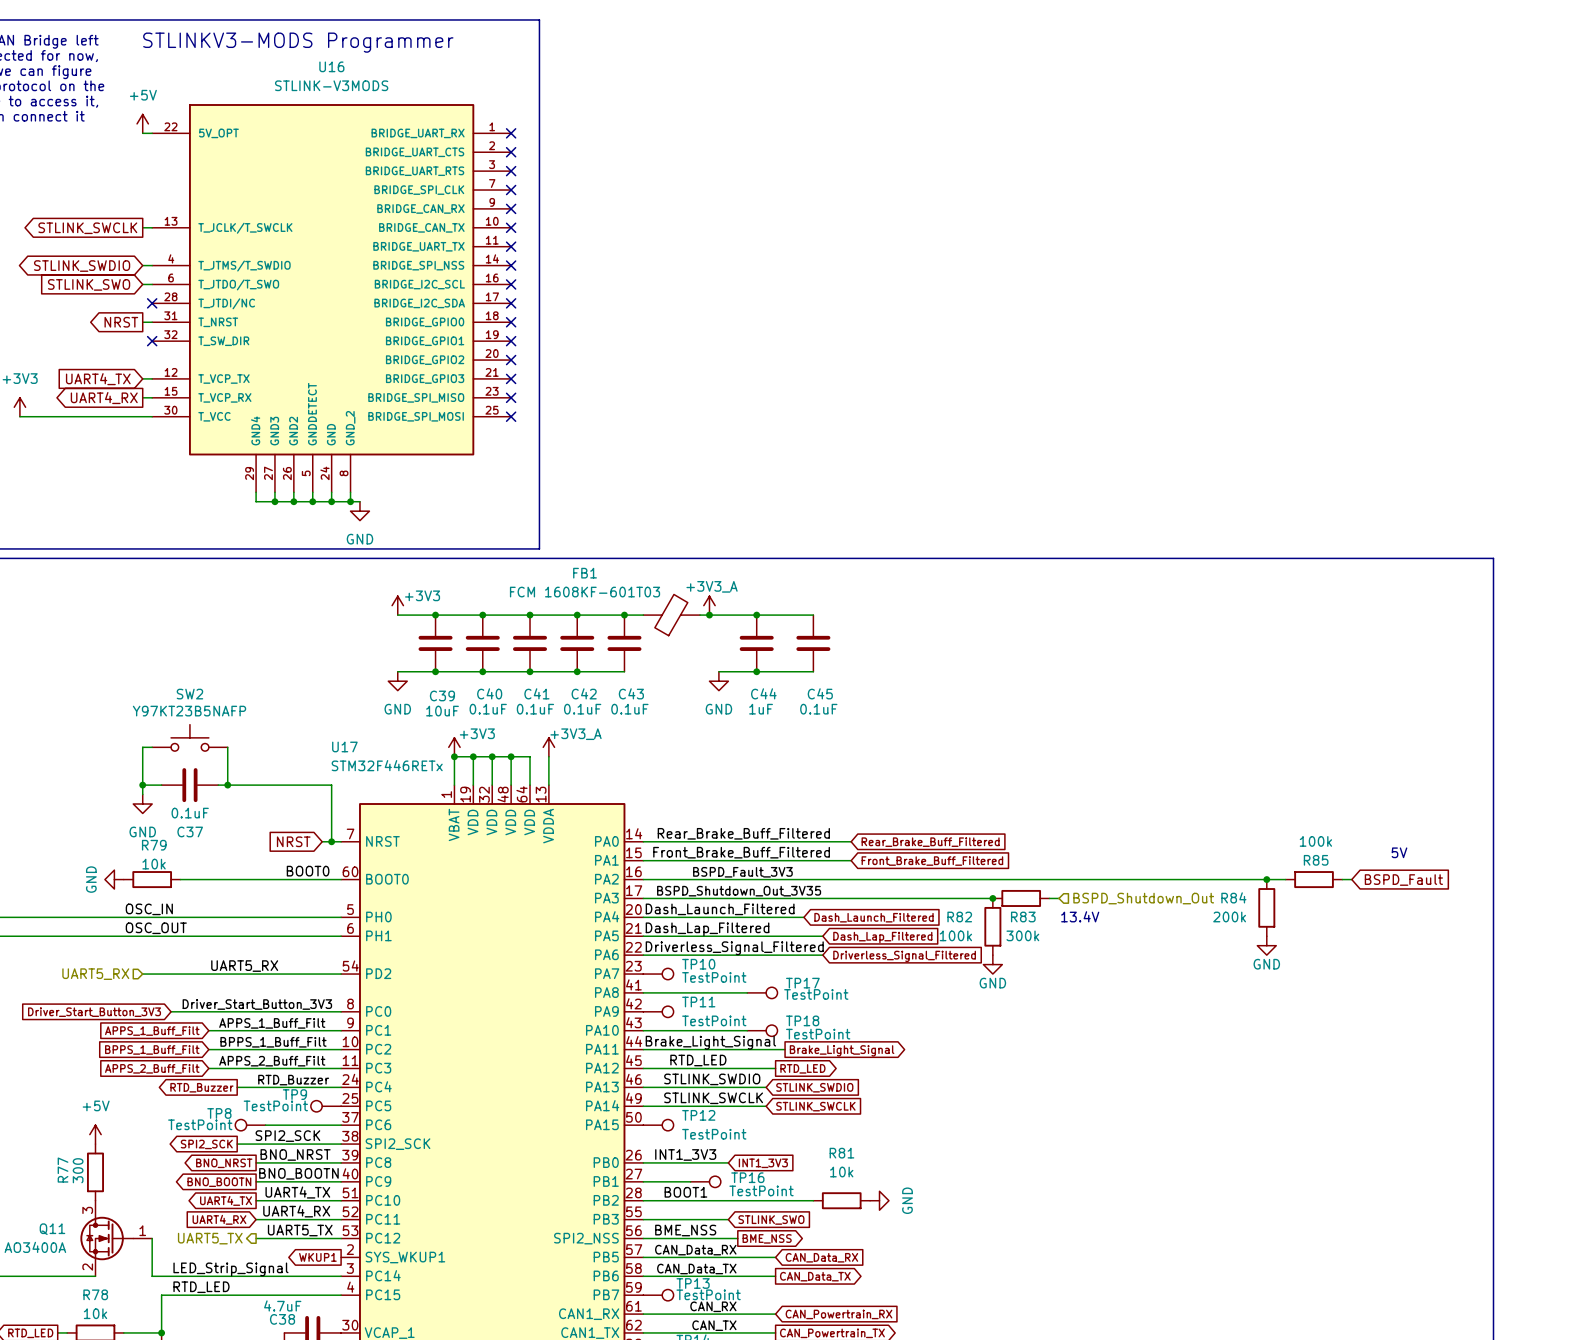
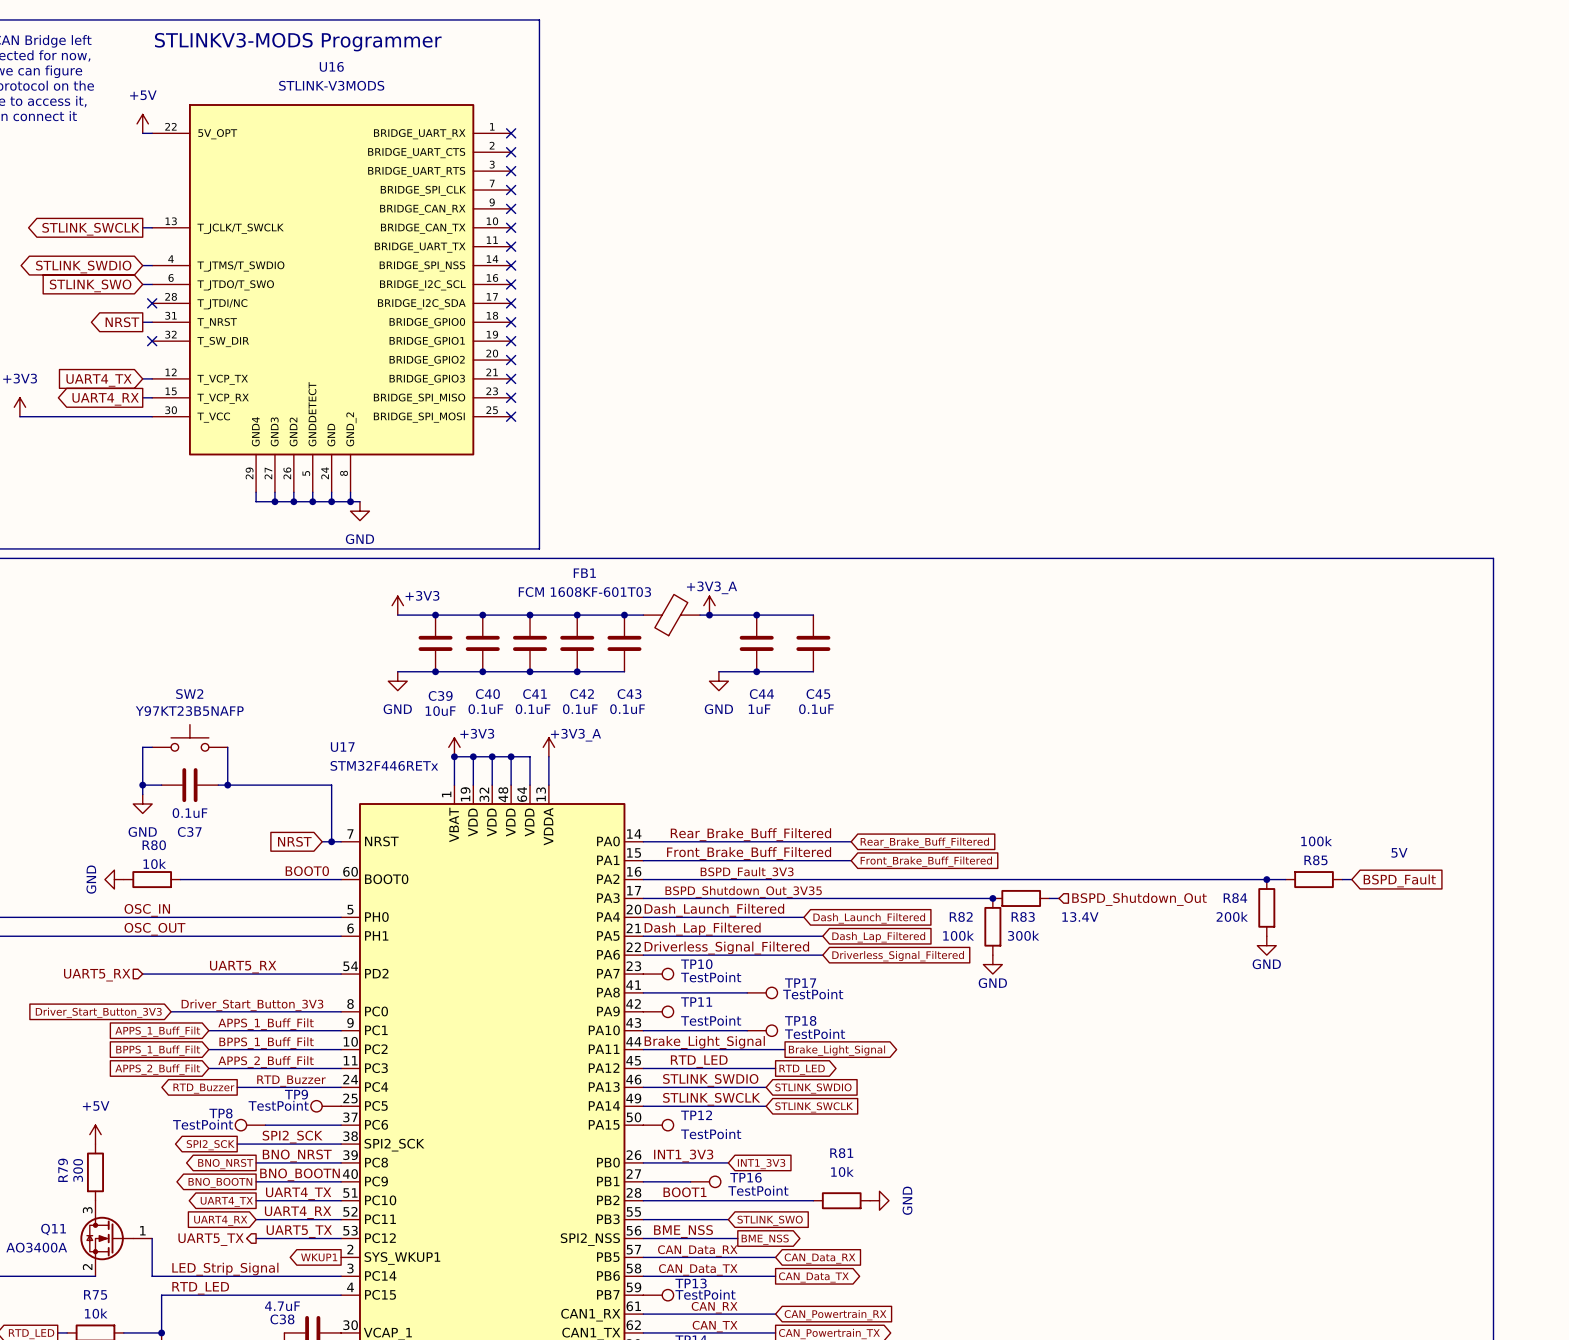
R79 name: R79 (154, 845) -> R80 (154, 845)
R77 name: R77 (63, 1170) -> R79 (63, 1170)
R78 name: R78 (95, 1294) -> R75 (95, 1294)

